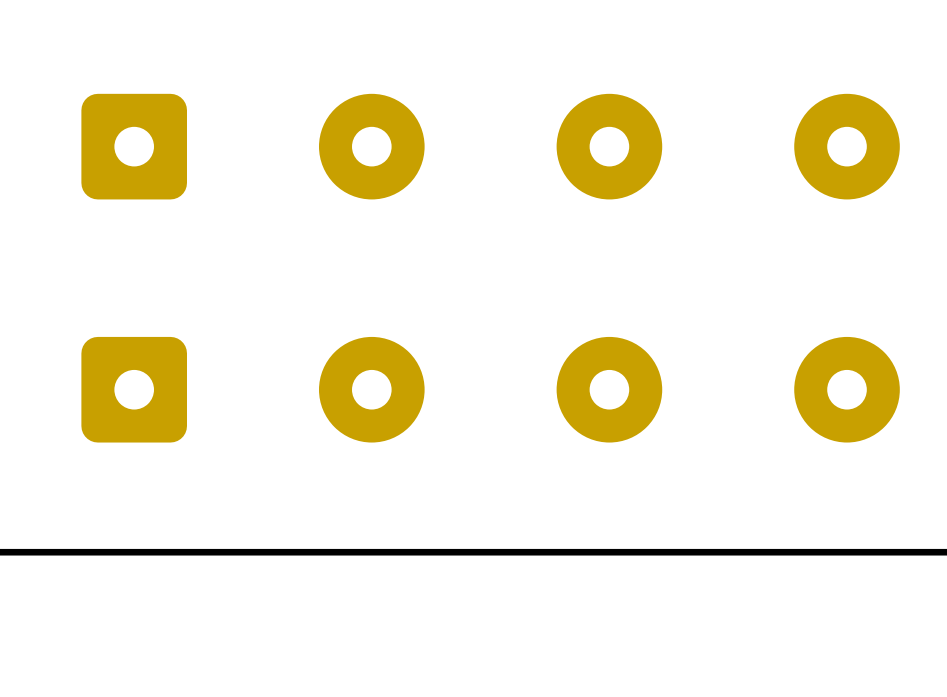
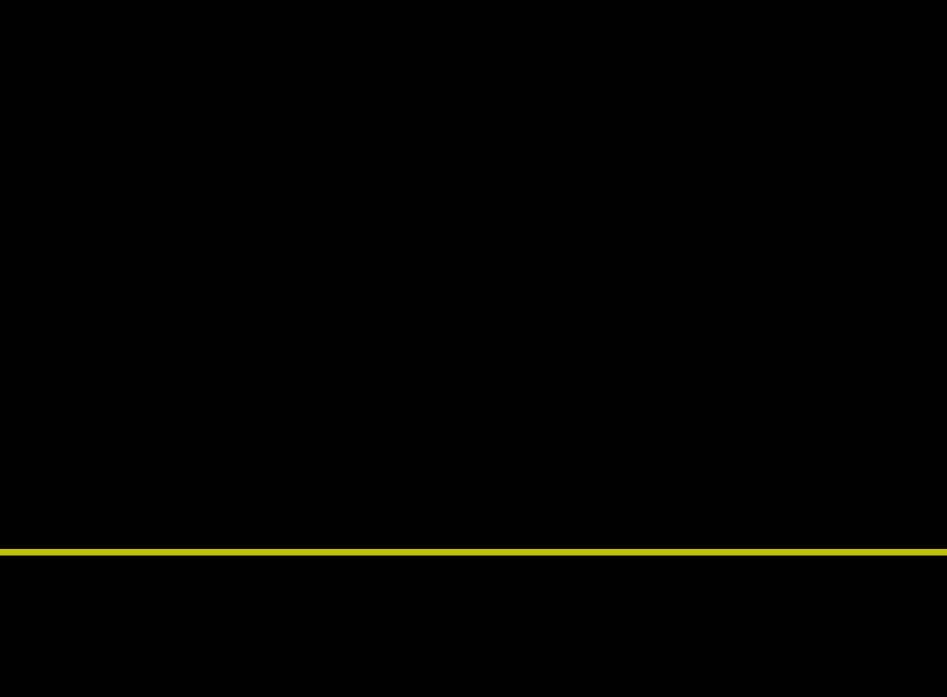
part: (490, 146) -> none
part: (490, 389) -> none

